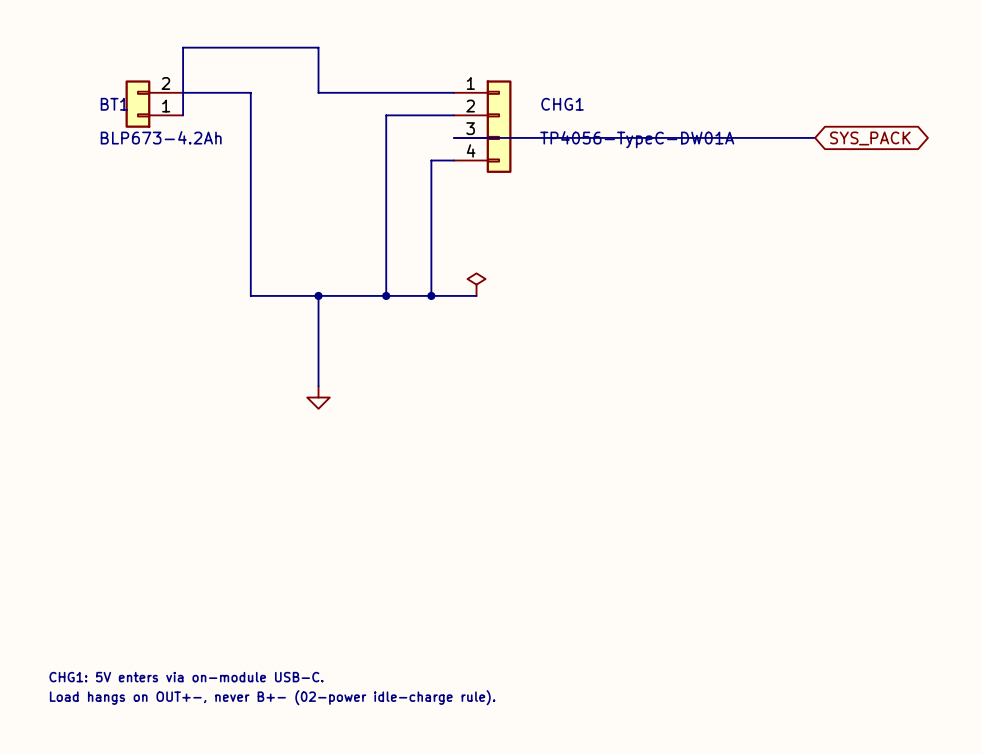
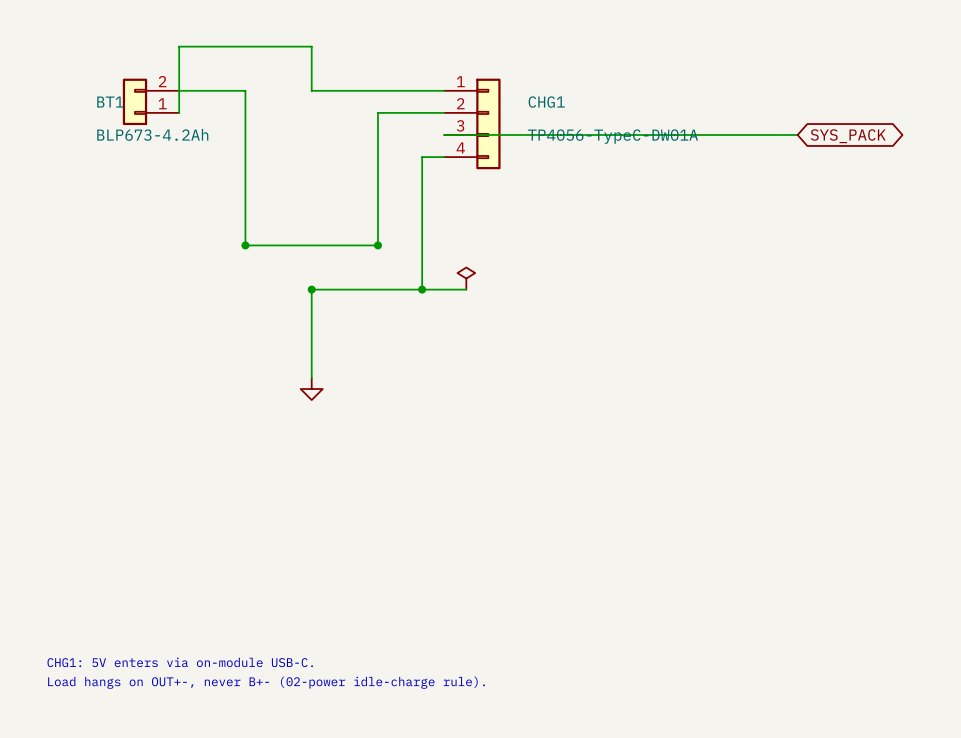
wire: (250, 250) (250, 295) (318, 295) -> (245, 245) (377, 245)
junction: none -> (245, 245)
wire: (386, 250) (386, 295) -> none
junction position: (386, 295) -> (377, 245)

